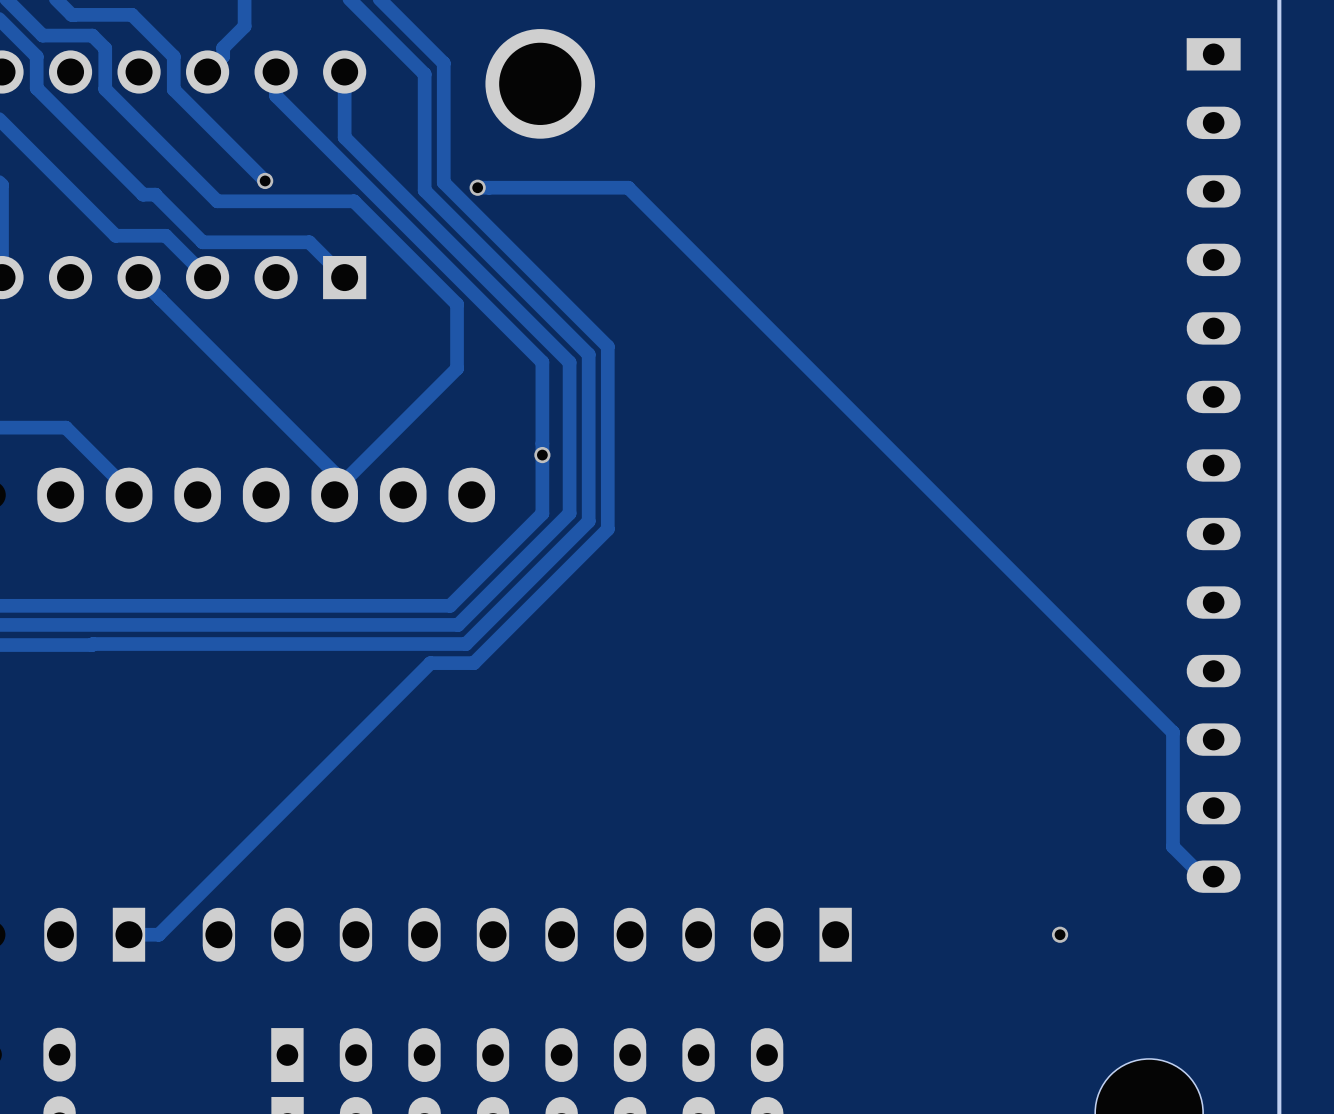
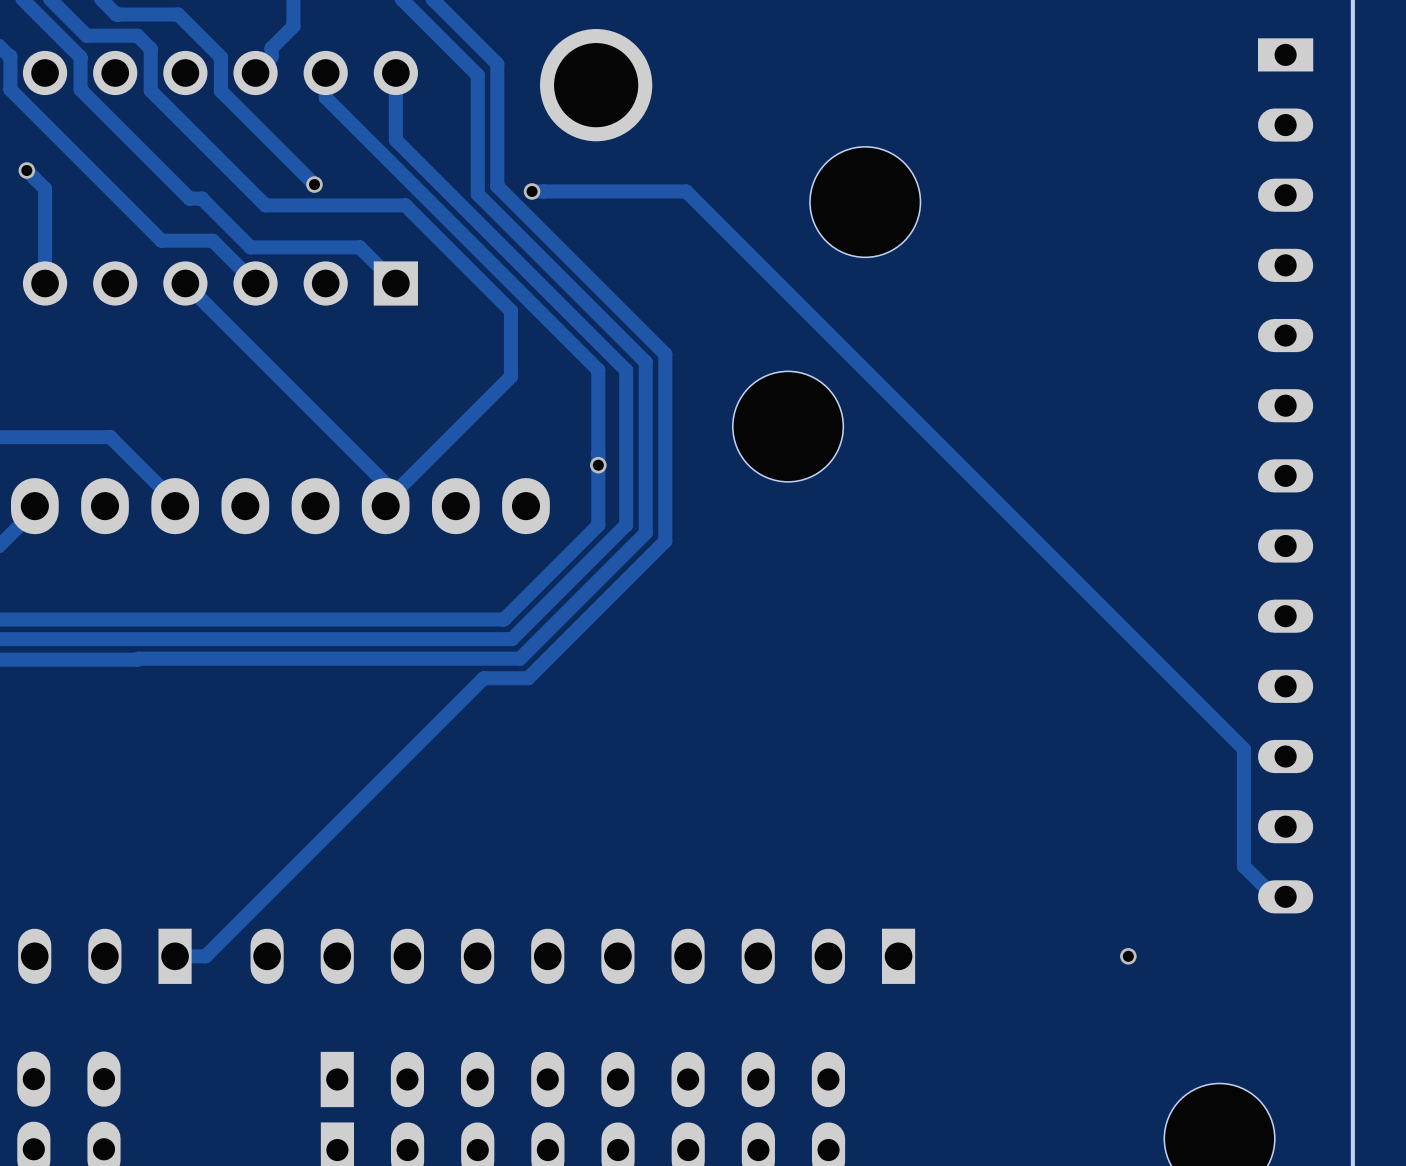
part: none -> (865, 202)
part: none -> (788, 426)

